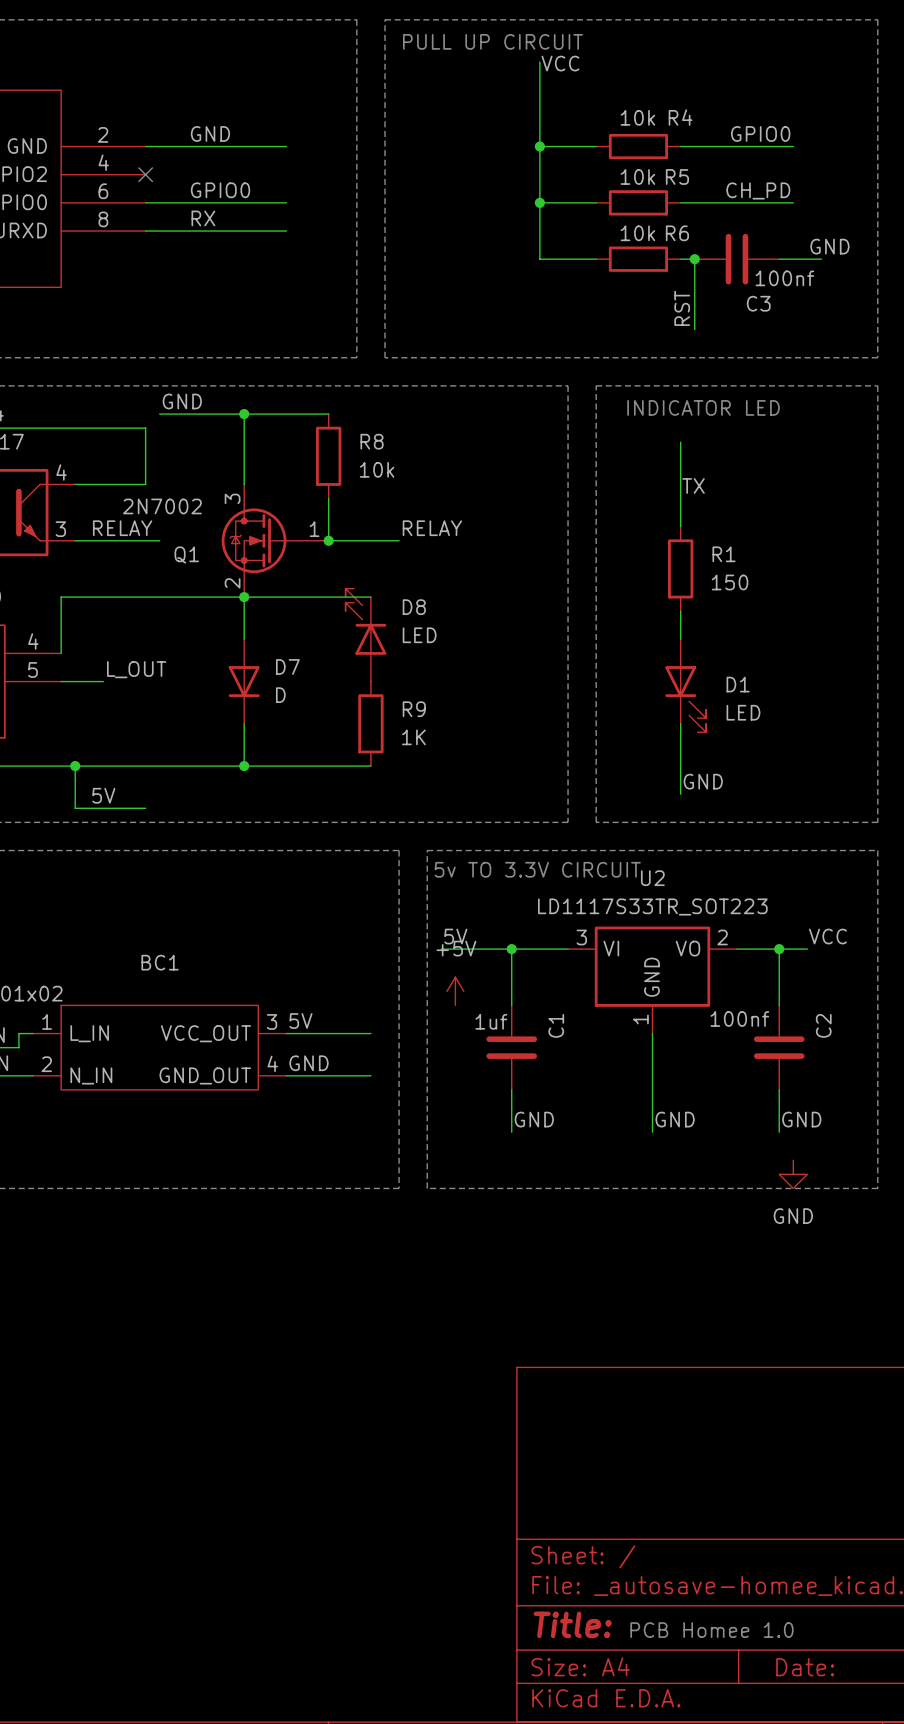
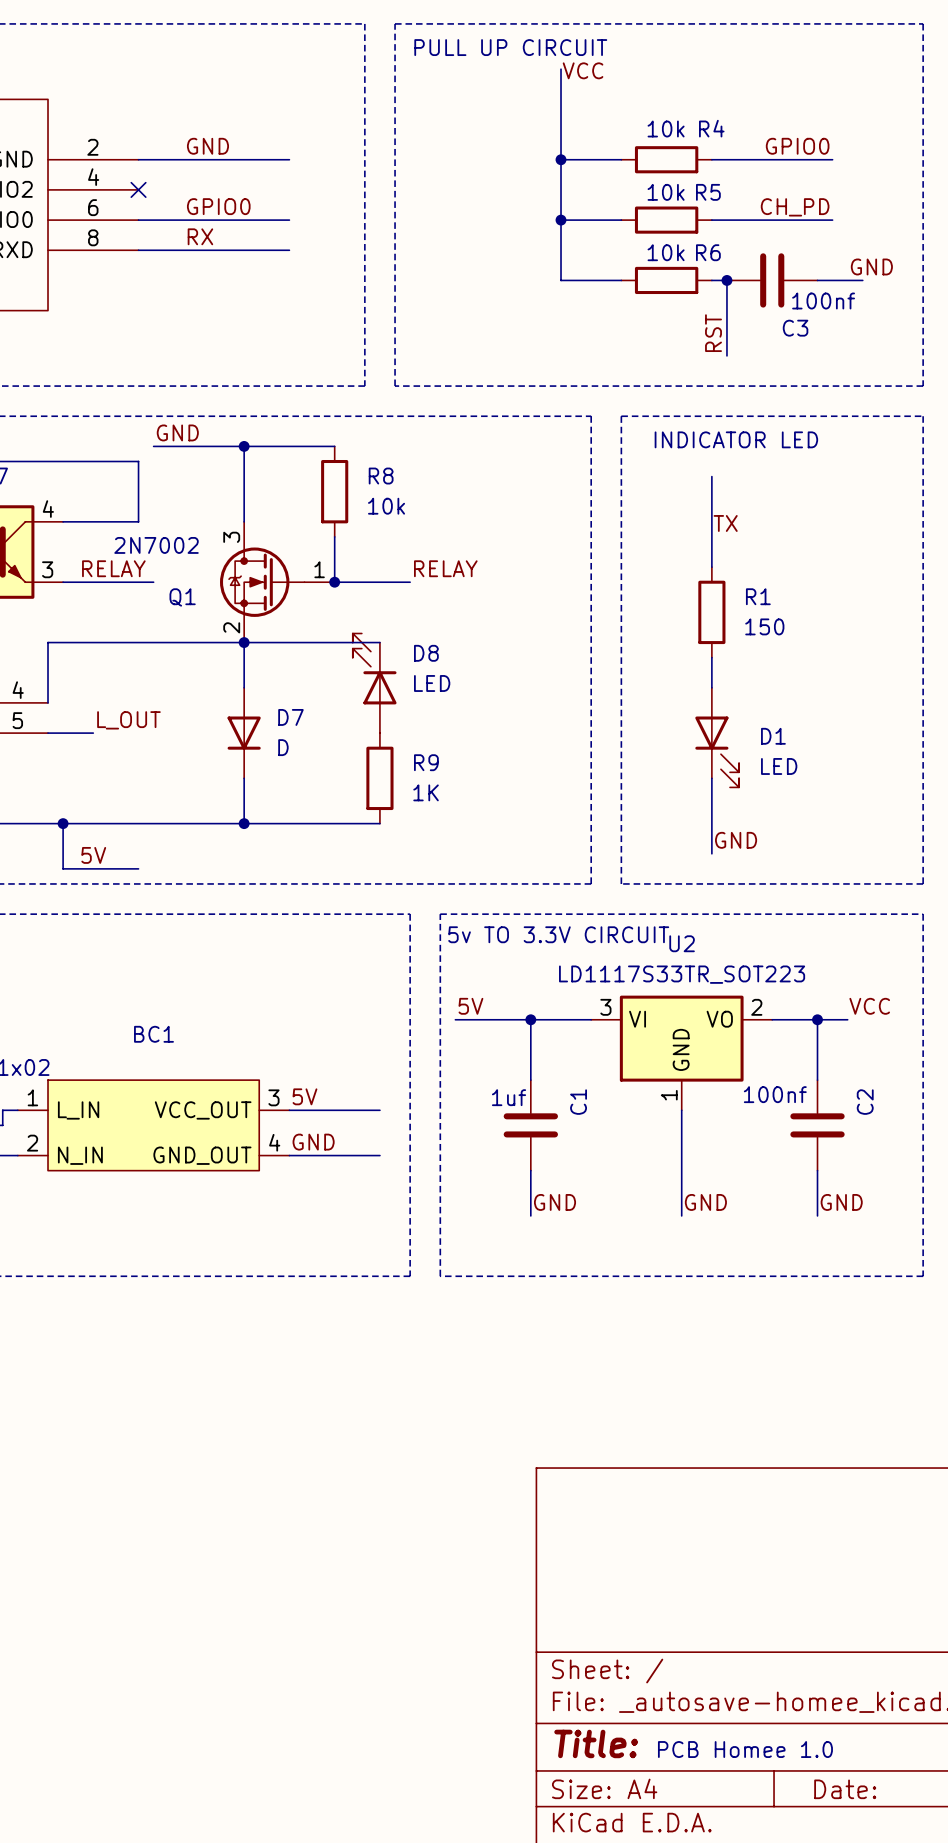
power symbol: +5V (455, 991) -> none
power symbol: GND (793, 1174) -> none

